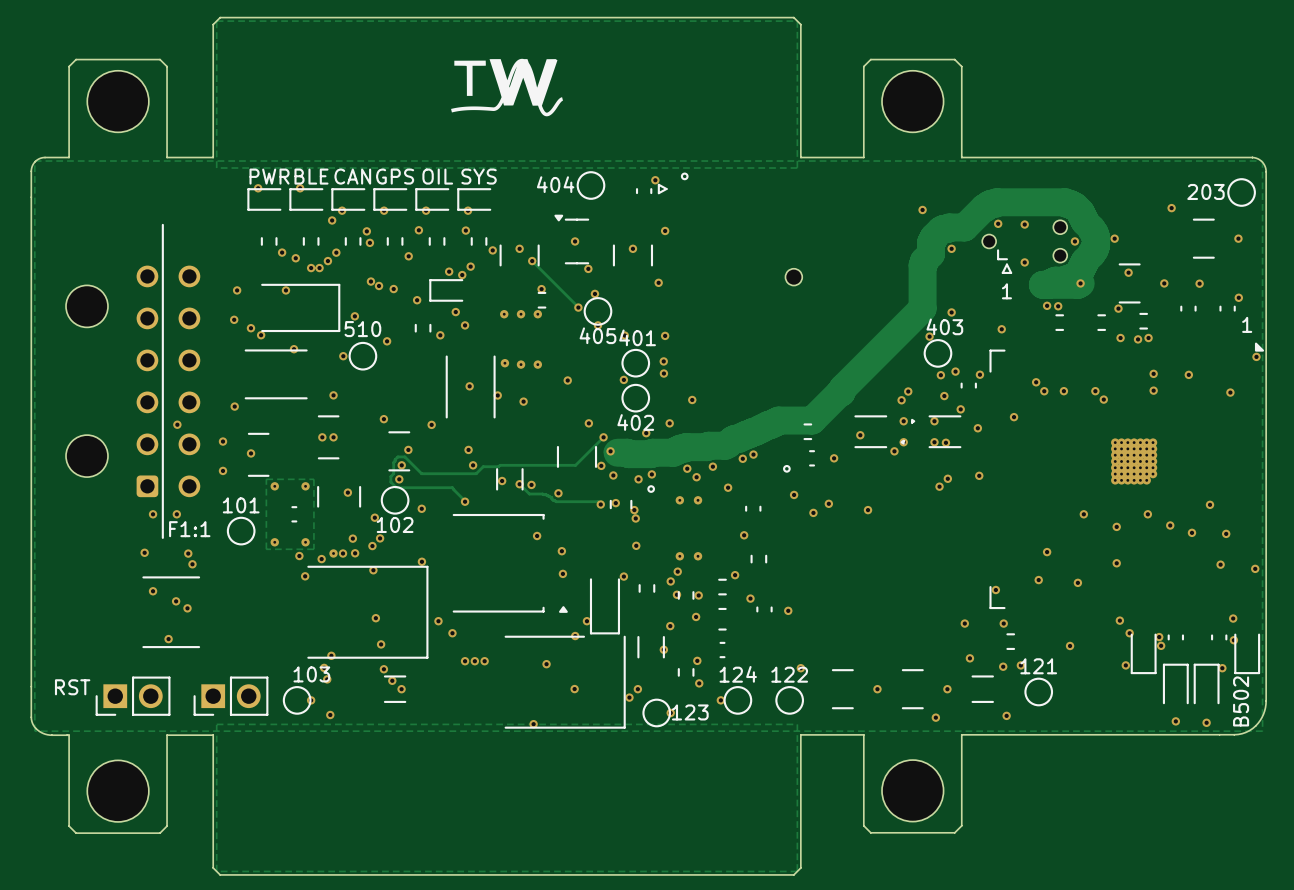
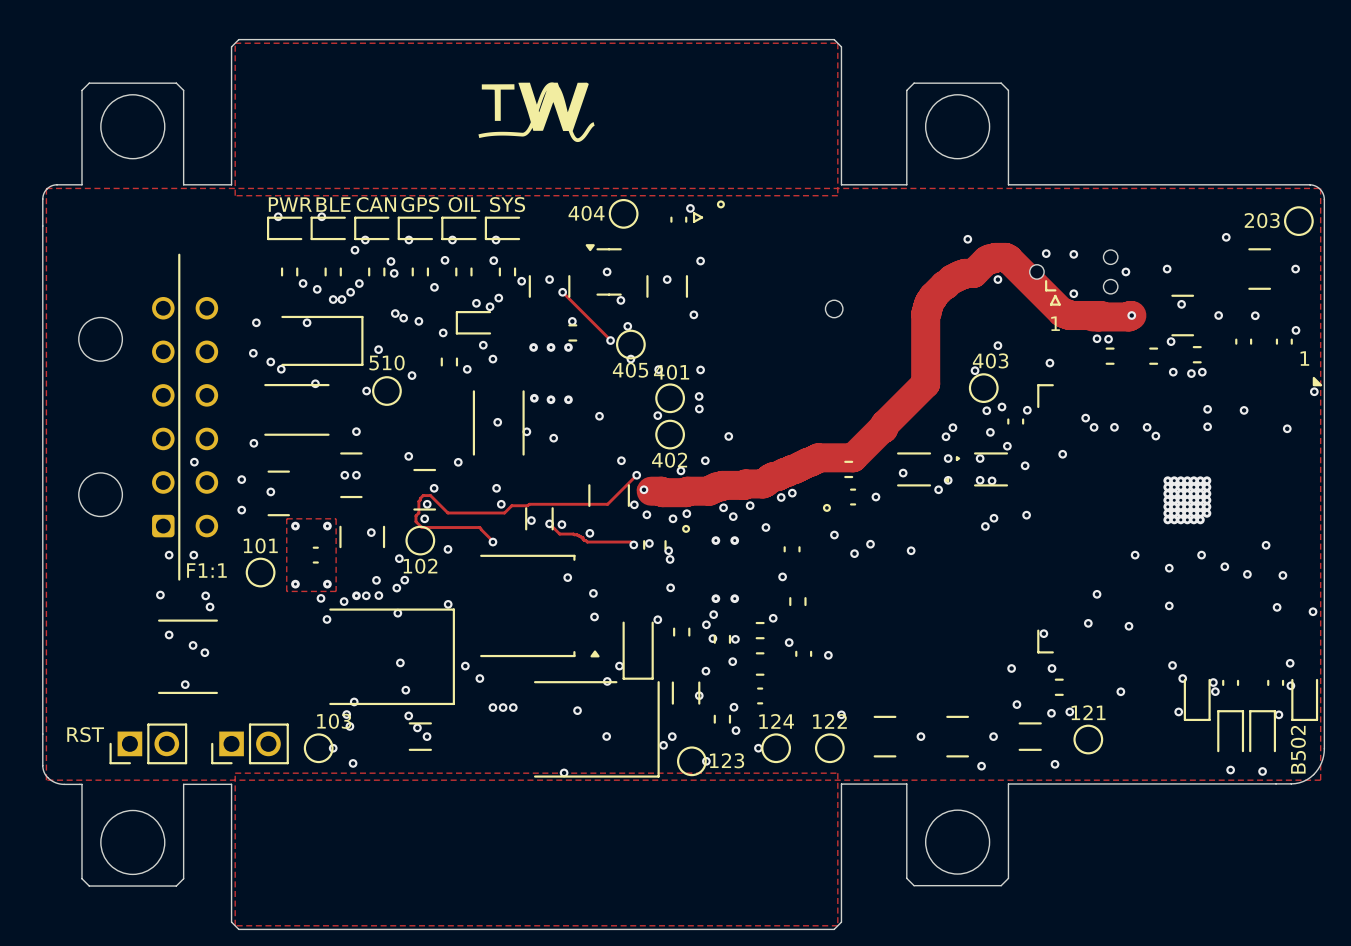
track: (958, 227) (964, 227) (984, 207) (996, 202) (1065, 202) (1075, 206) (1094, 233) (1096, 245) (1075, 276) (1065, 280) (1055, 280) (1051, 283) -> (1005, 257) (1062, 312) (1069, 315) (1099, 315)
track: (933, 237) (930, 242) (930, 254) (922, 265) (922, 308) (882, 349) -> (979, 267) (973, 273) (964, 273) (951, 279) (932, 296) (928, 303) (925, 314) (925, 383)

